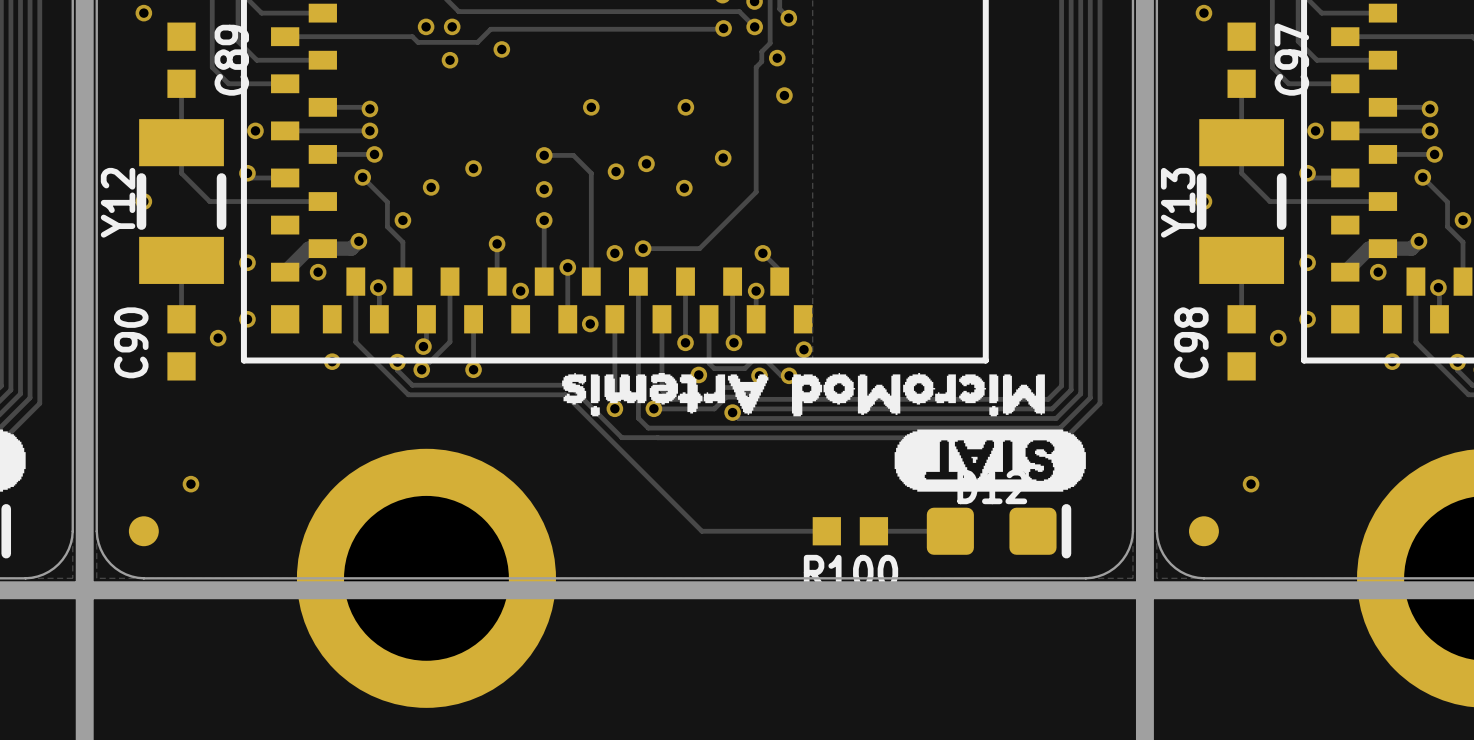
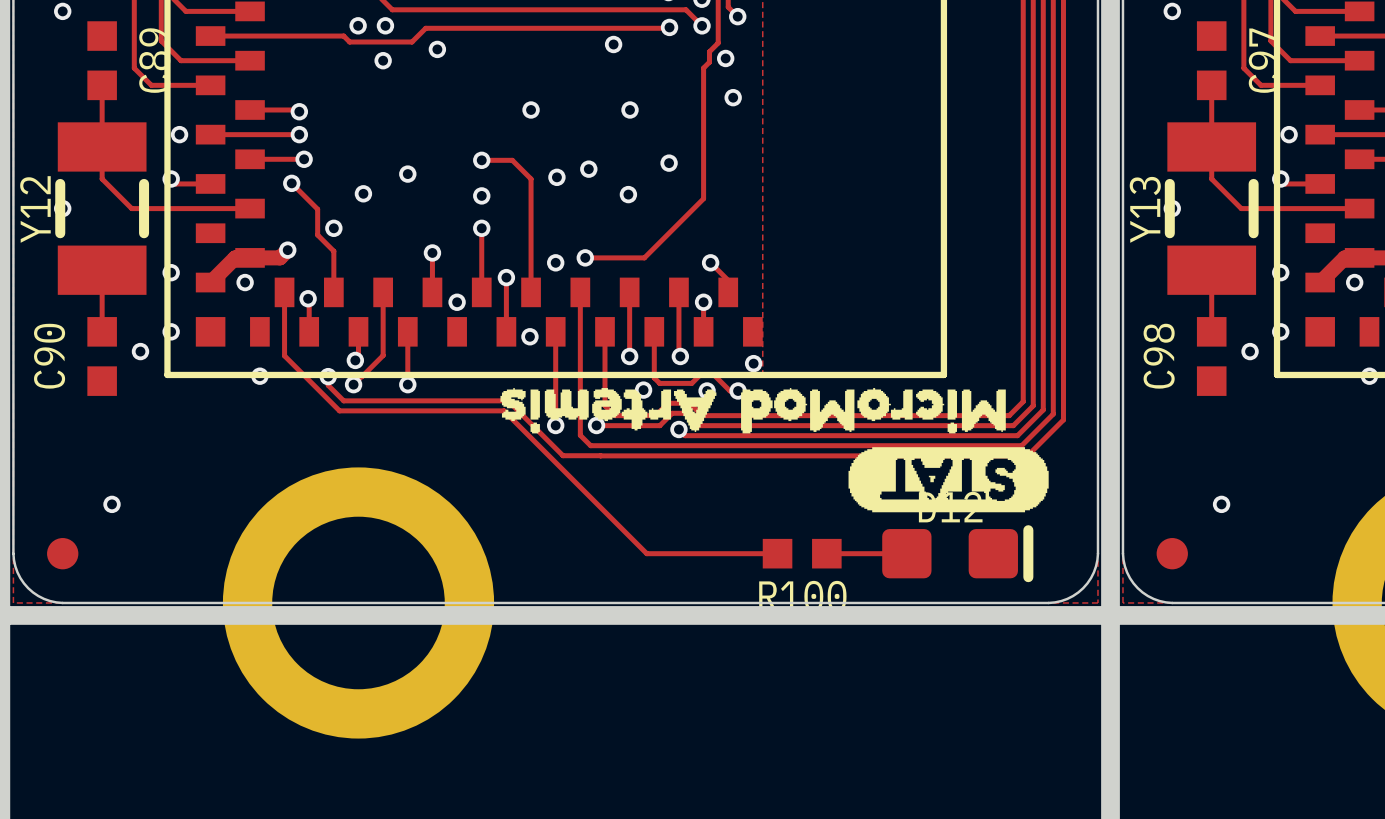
via: none -> (613, 44)

